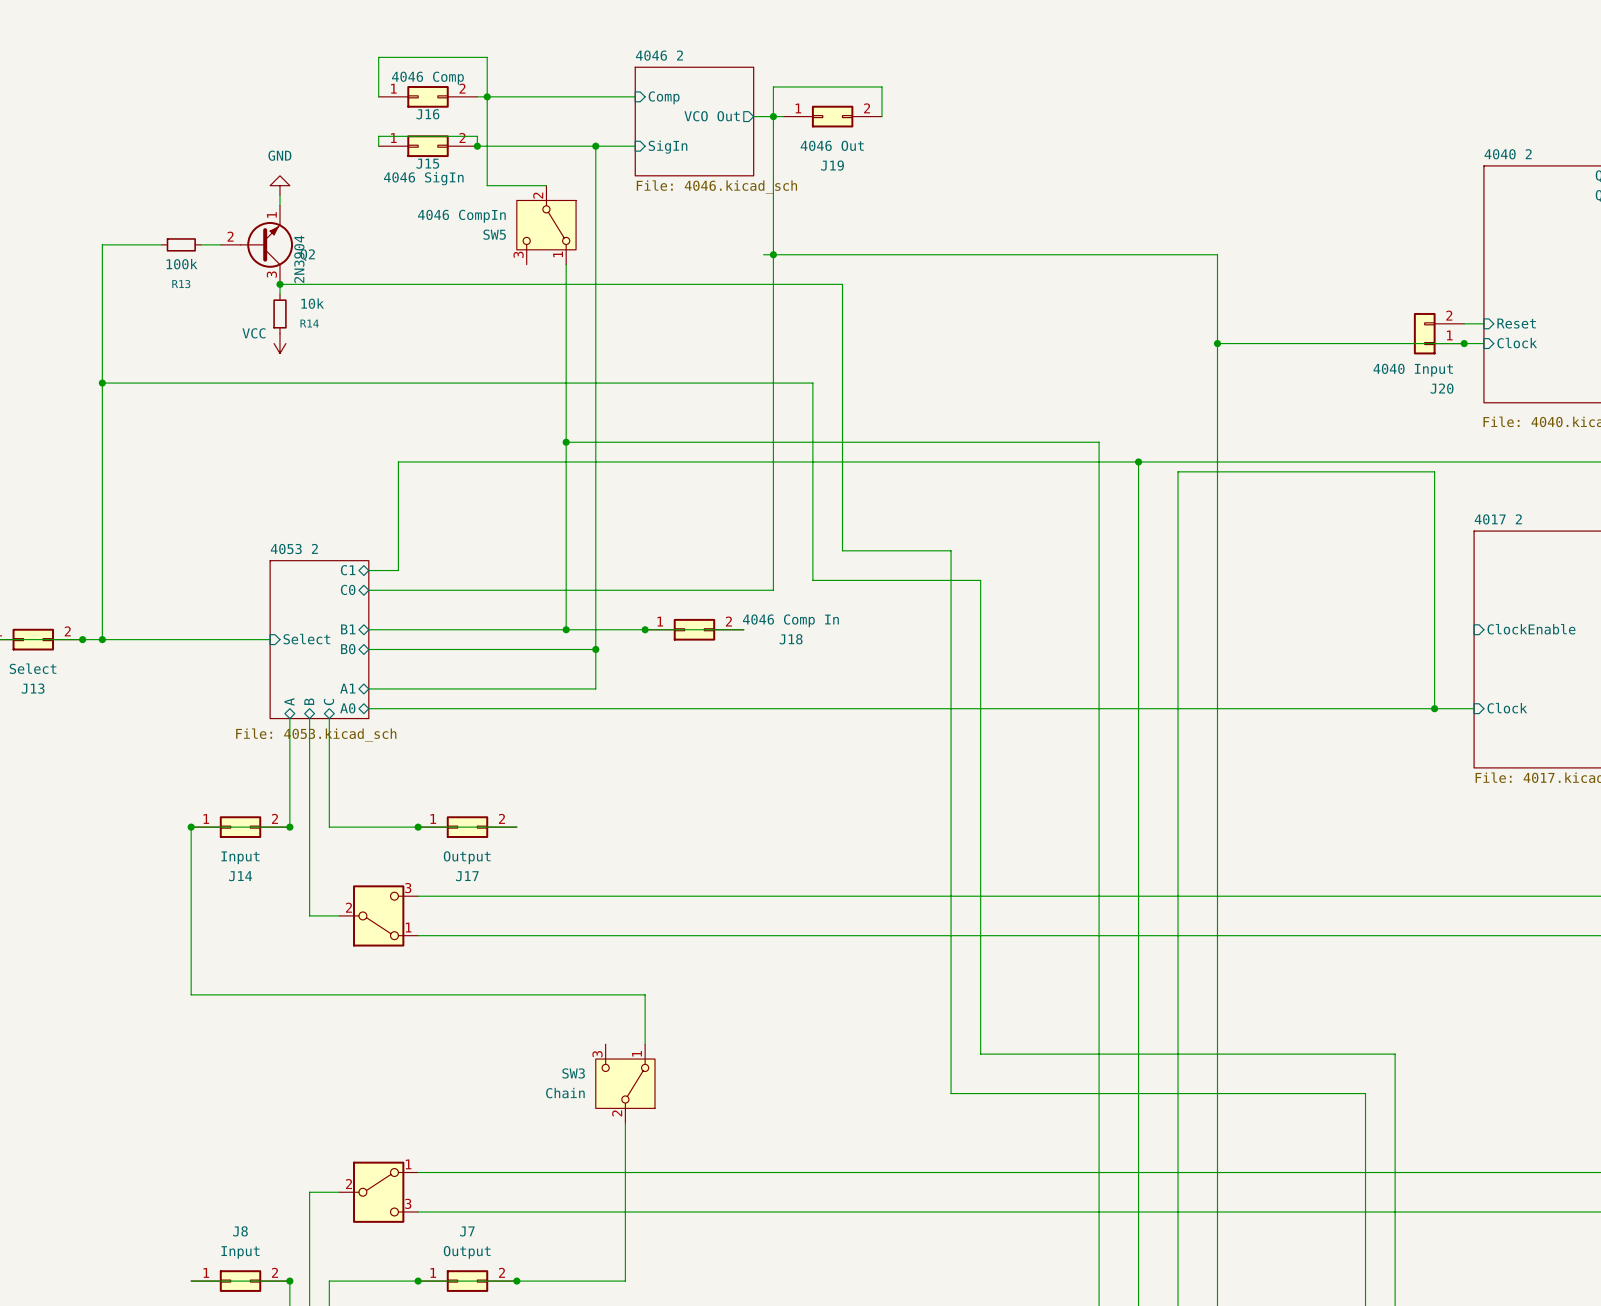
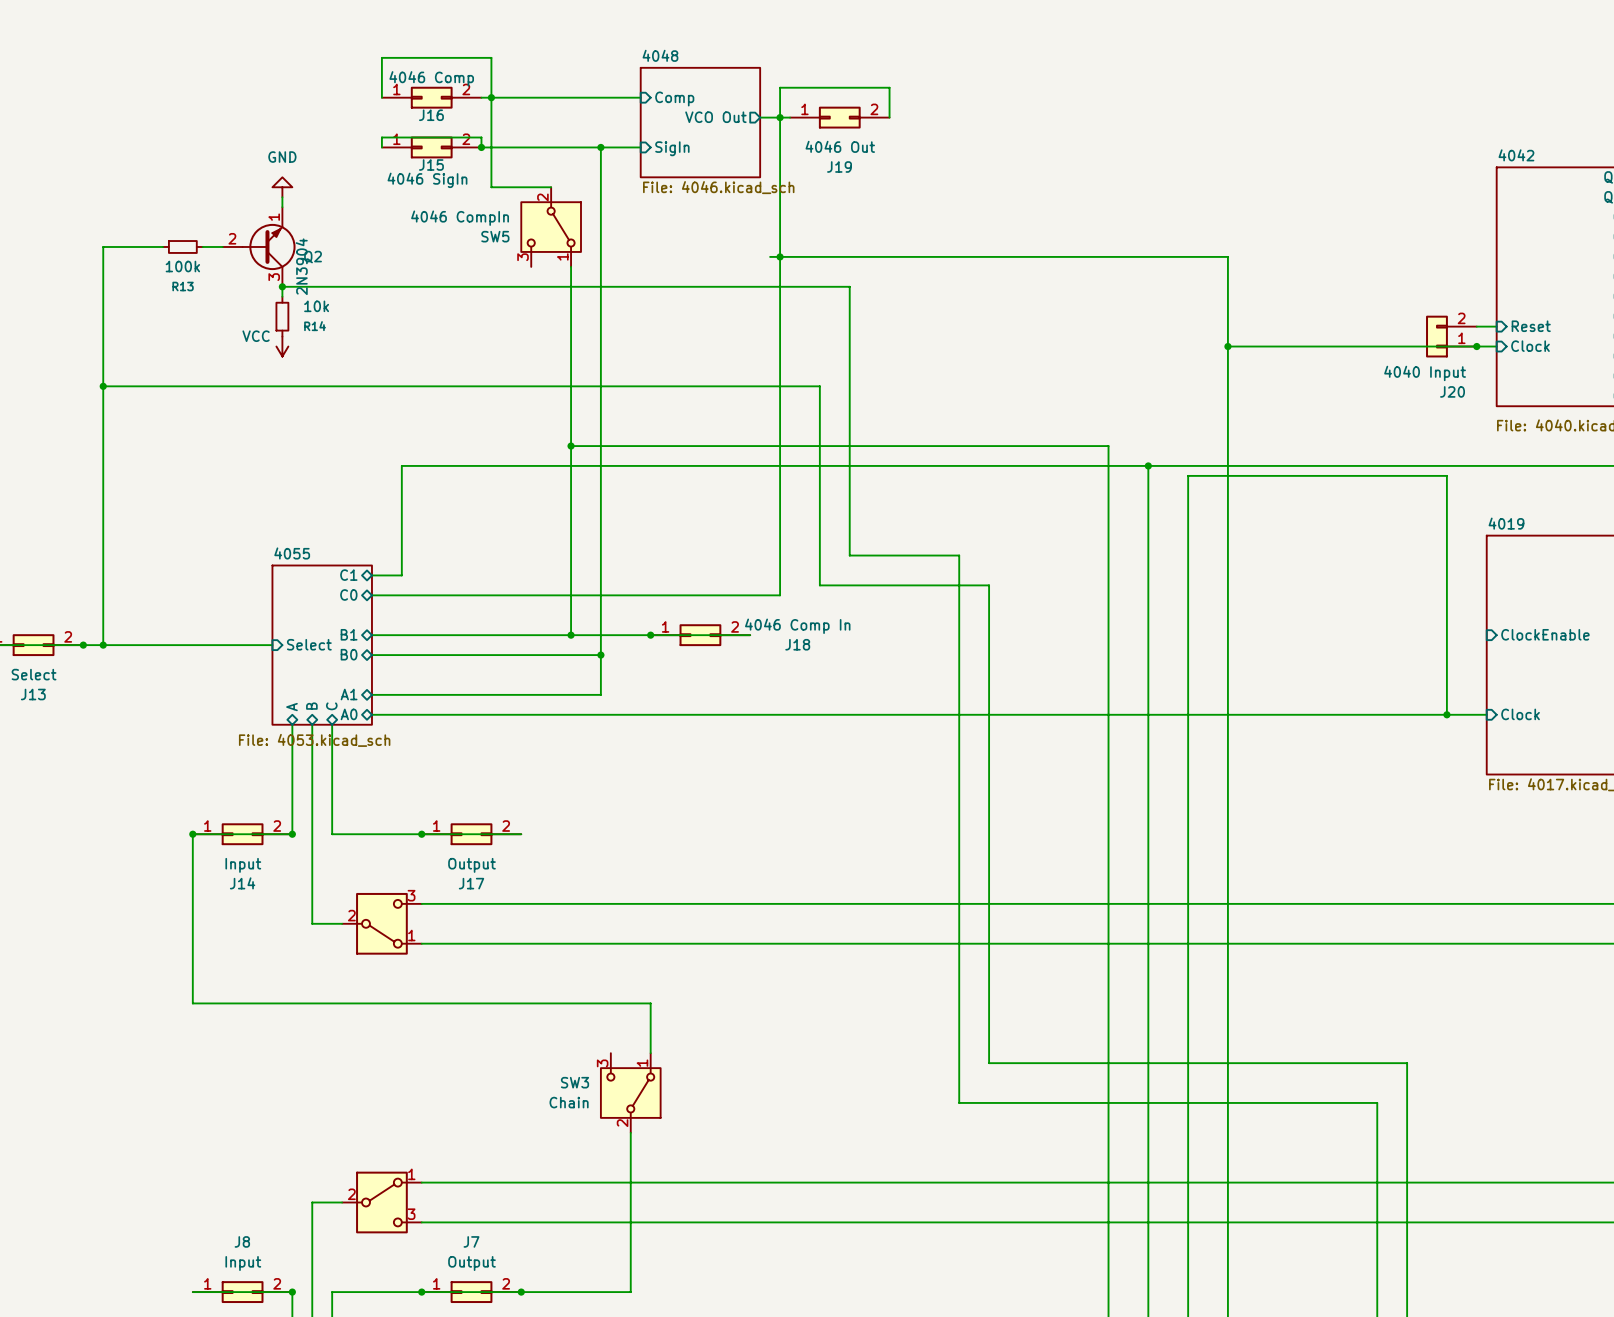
sheet 4046 2 name: 4046 2 (659, 55) -> 4048 (660, 55)
sheet 4040 2 name: 4040 2 (1508, 154) -> 4042 (1516, 155)
sheet 4017 2 name: 4017 2 (1498, 519) -> 4019 (1506, 523)
sheet 4053 2 name: 4053 2 (294, 549) -> 4055 (292, 553)

